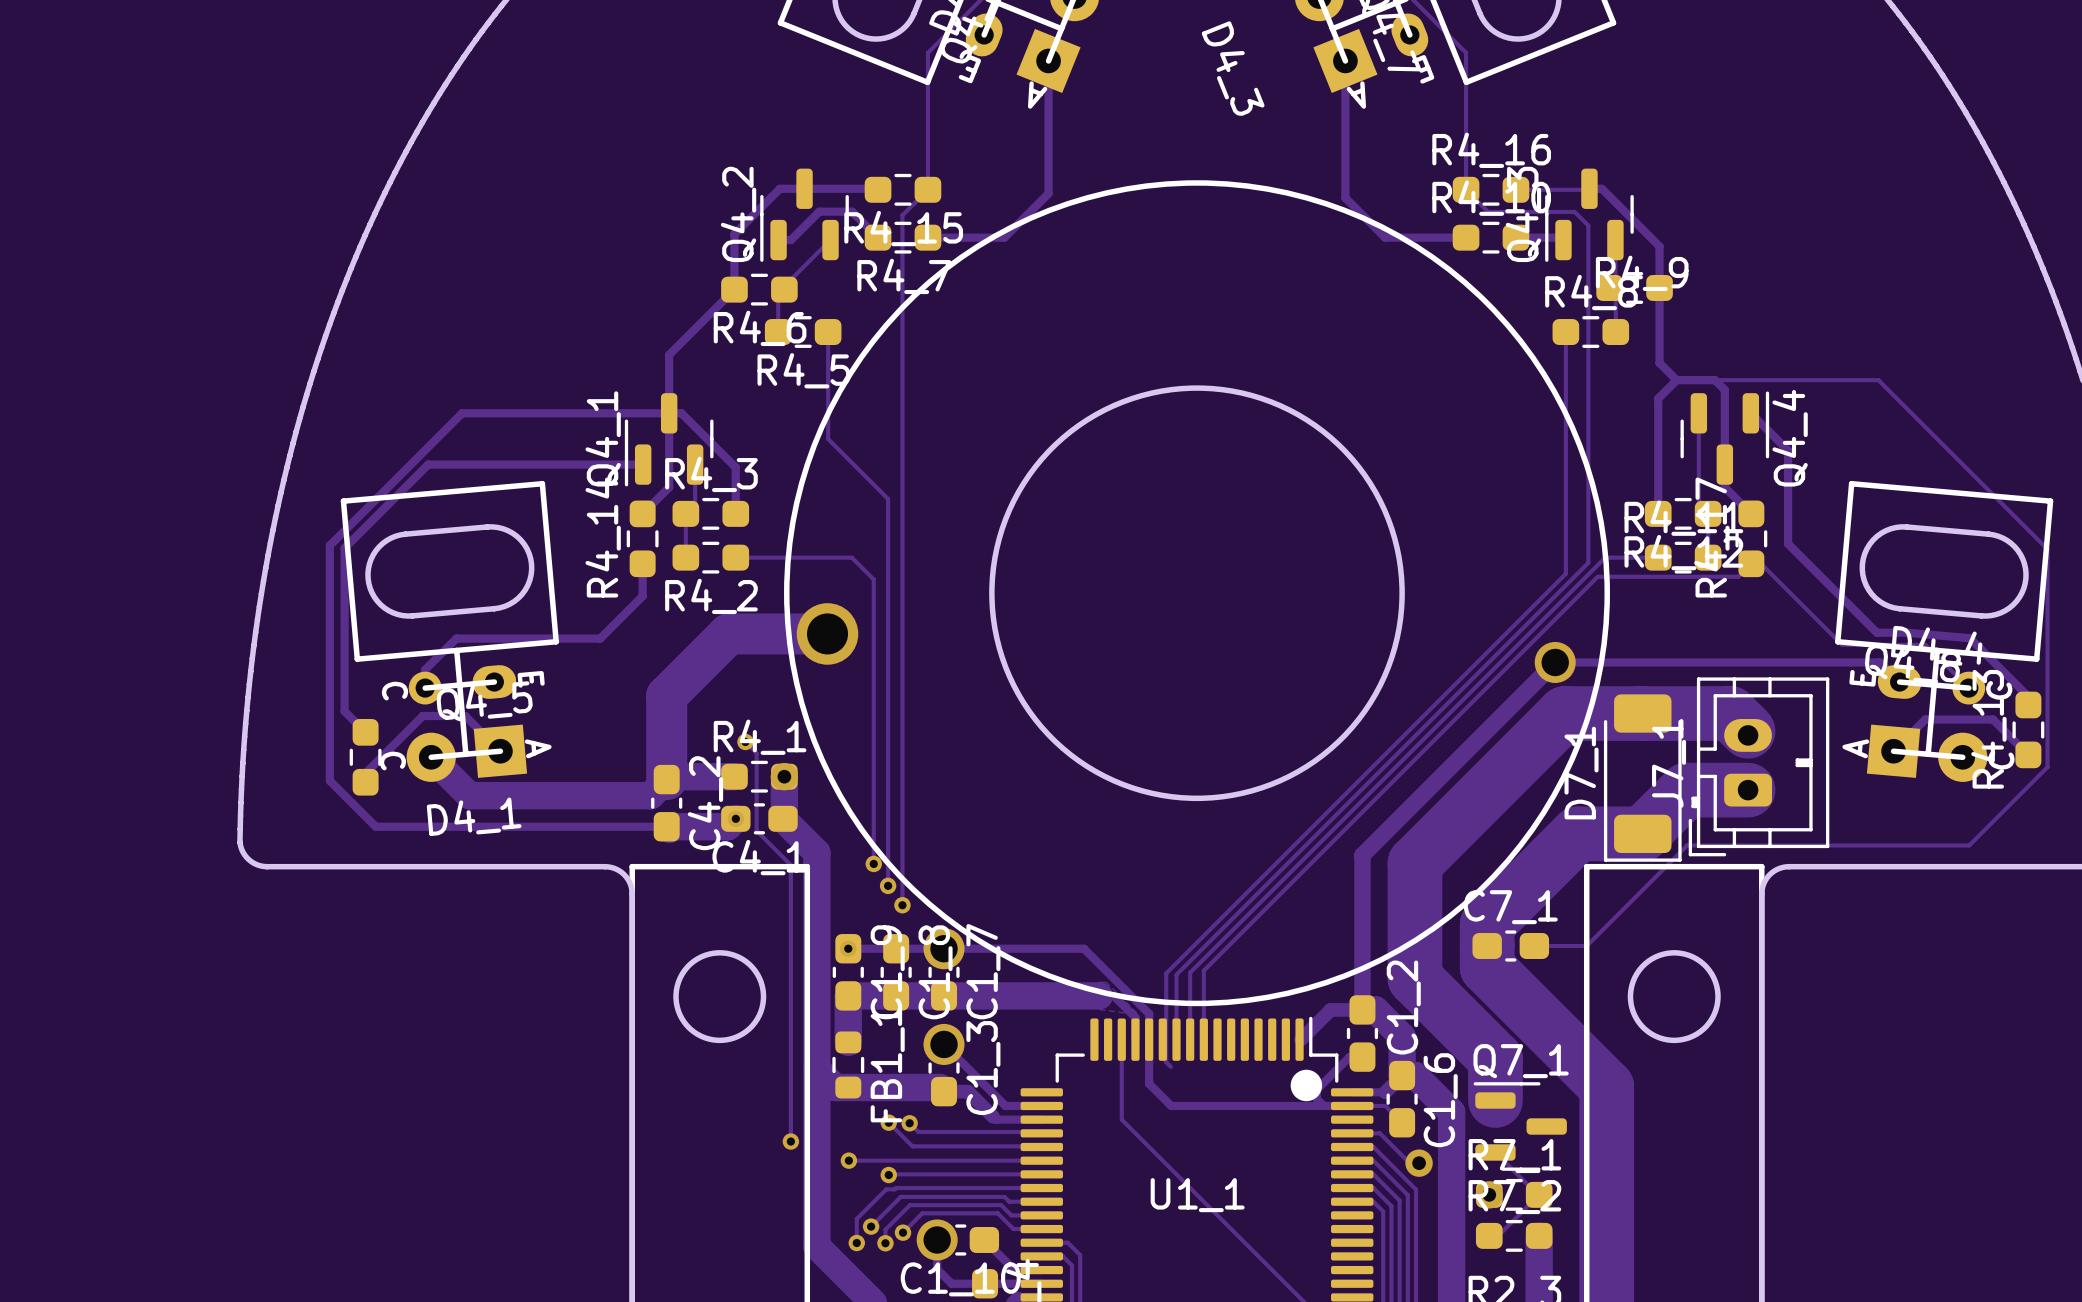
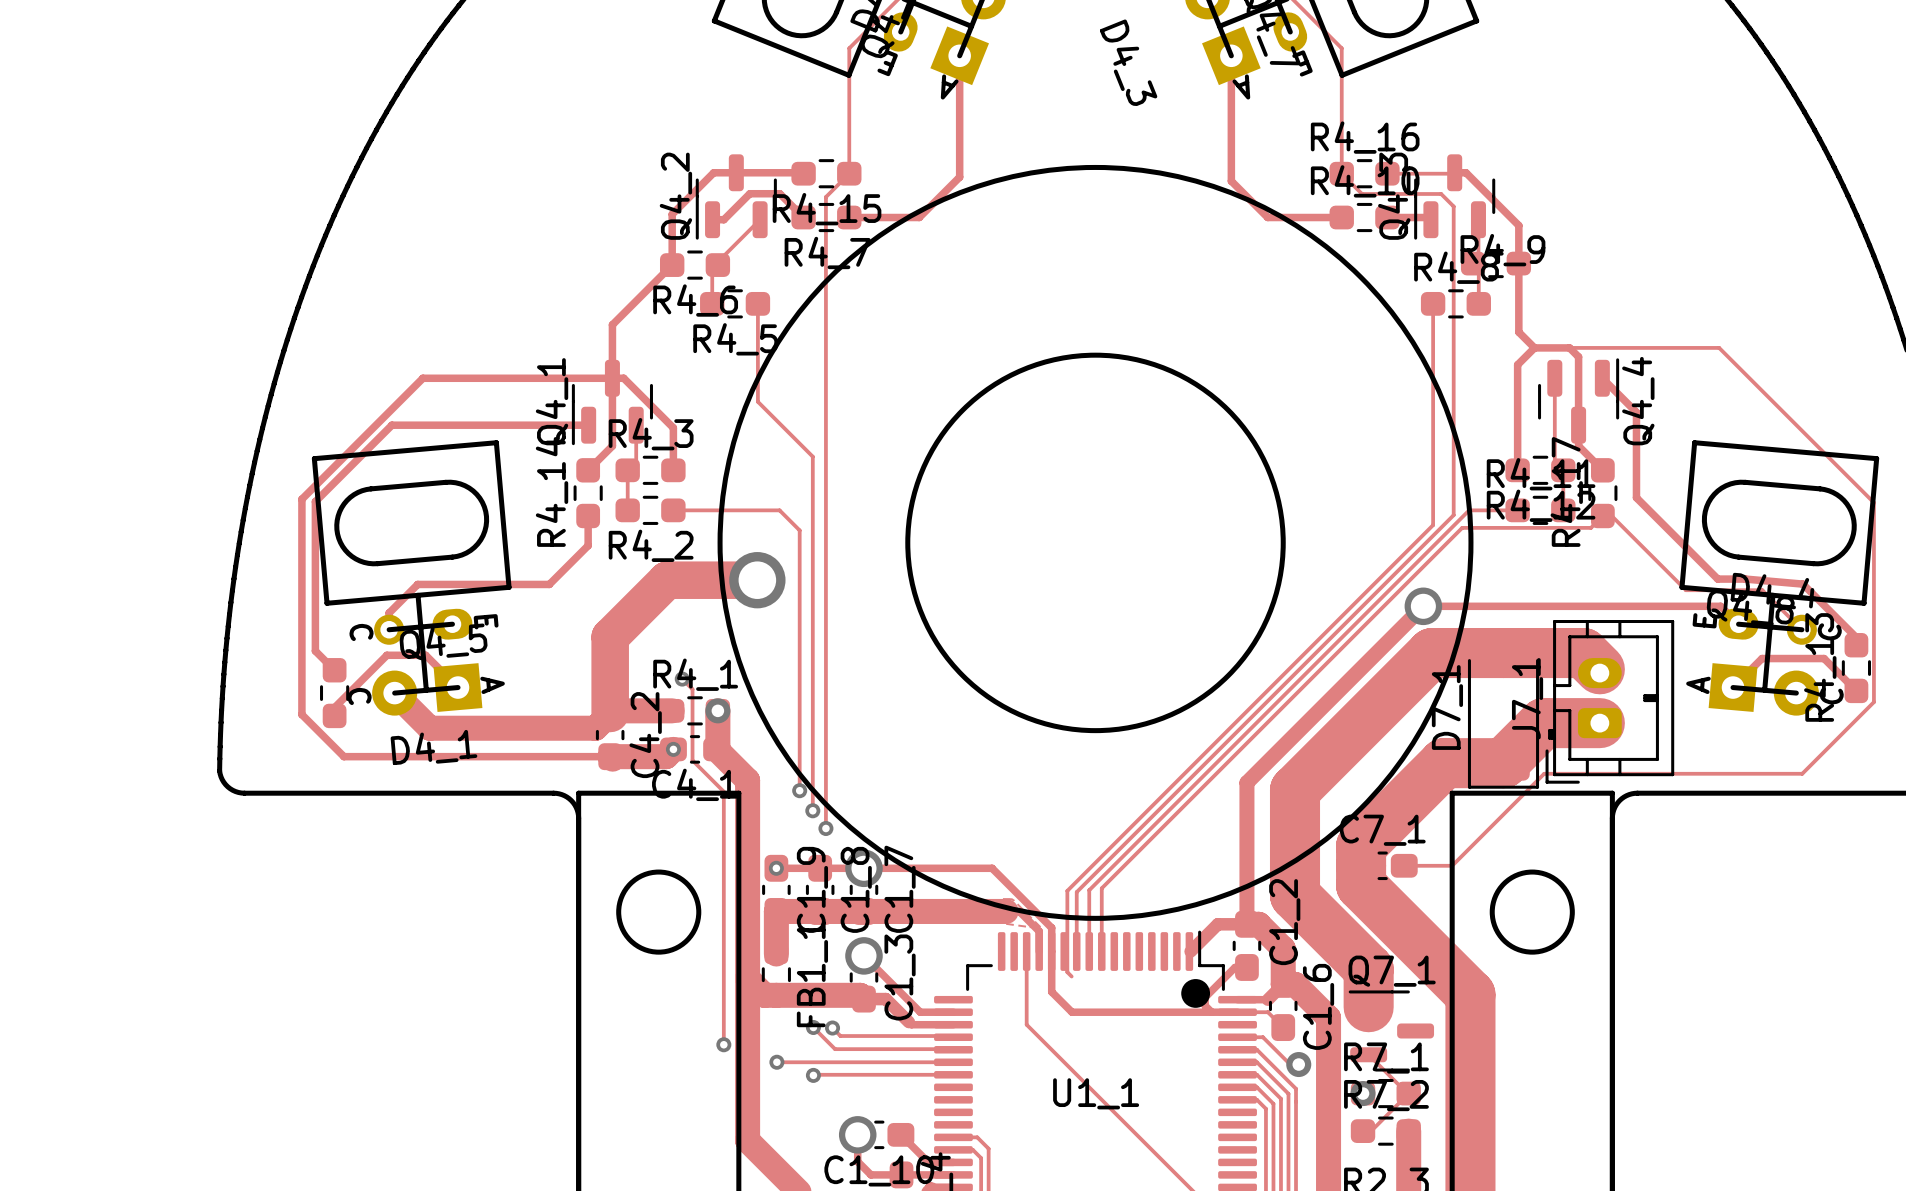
track: (1041, 1188) (886, 1189) (856, 1218) (856, 1243) -> none
track: (1041, 1201) (1009, 1201) (1004, 1196) (900, 1196) (871, 1226) -> none
track: (1041, 1215) (1011, 1215) (1001, 1205) (909, 1205) (885, 1229) (885, 1243) -> none
via: (871, 1226) -> none
track: (1041, 1229) (1013, 1229) (997, 1213) (922, 1213) (903, 1232) -> none
via: (903, 1232) -> none
via: (856, 1243) -> none
via: (885, 1243) -> none

